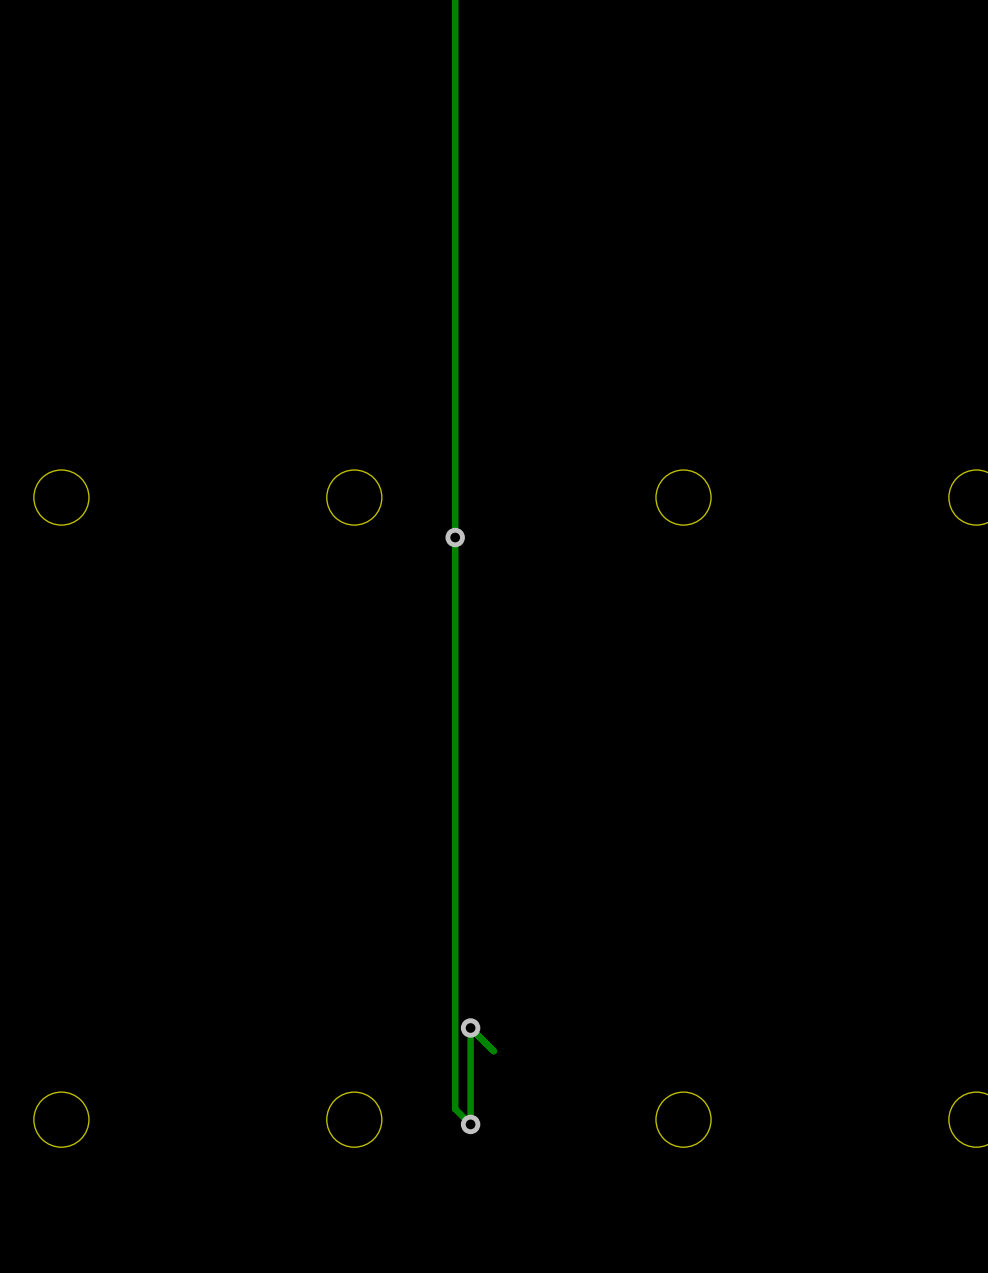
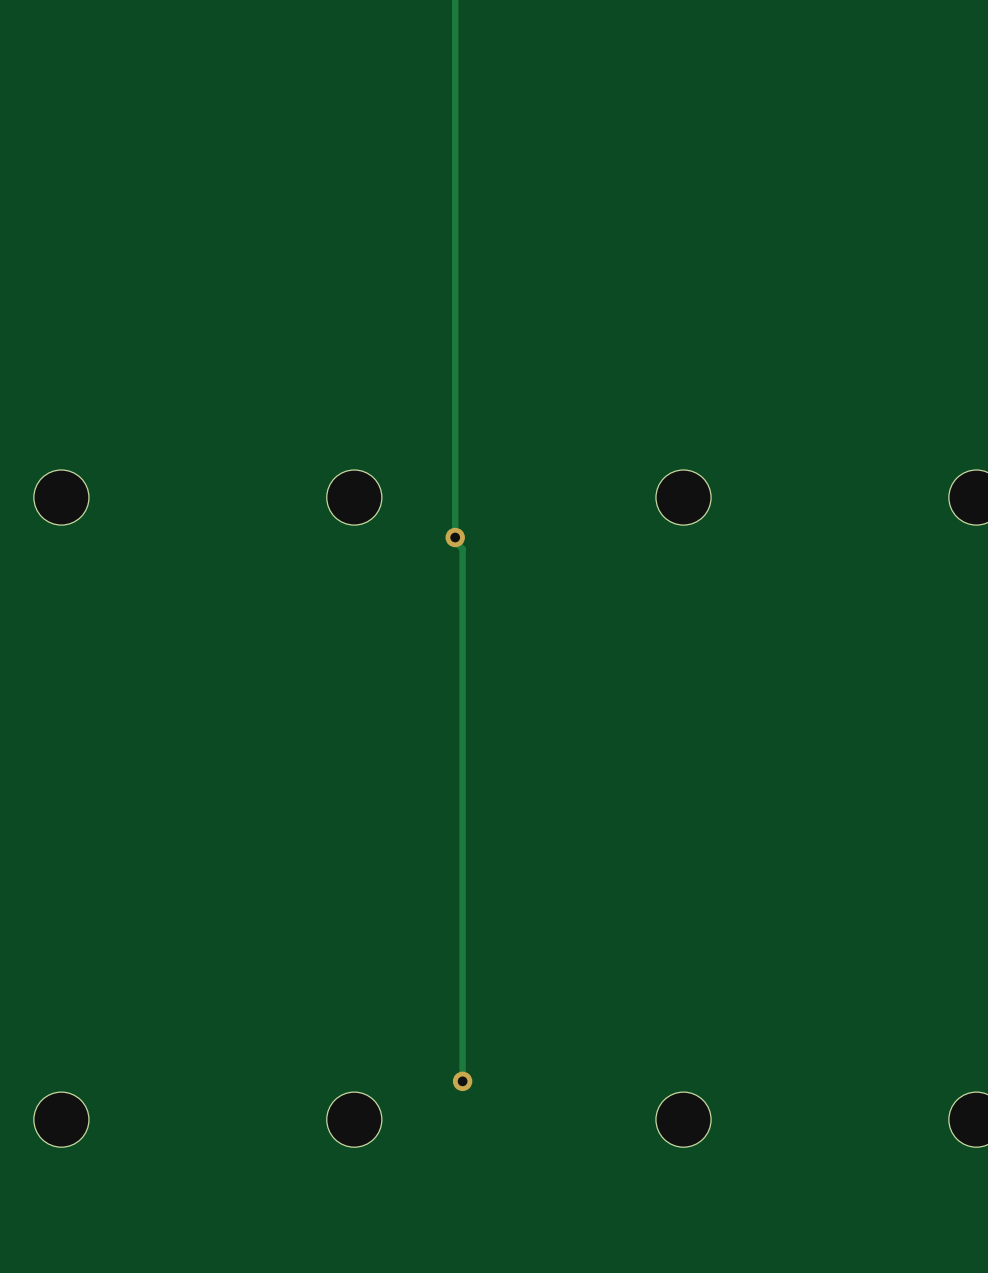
track: (455, 541) (455, 1109) (470, 1124) (470, 1027) (493, 1051) -> (455, 541) (462, 548) (462, 1081)
via: (470, 1027) -> none
via: none -> (462, 1081)
via: (470, 1124) -> none

